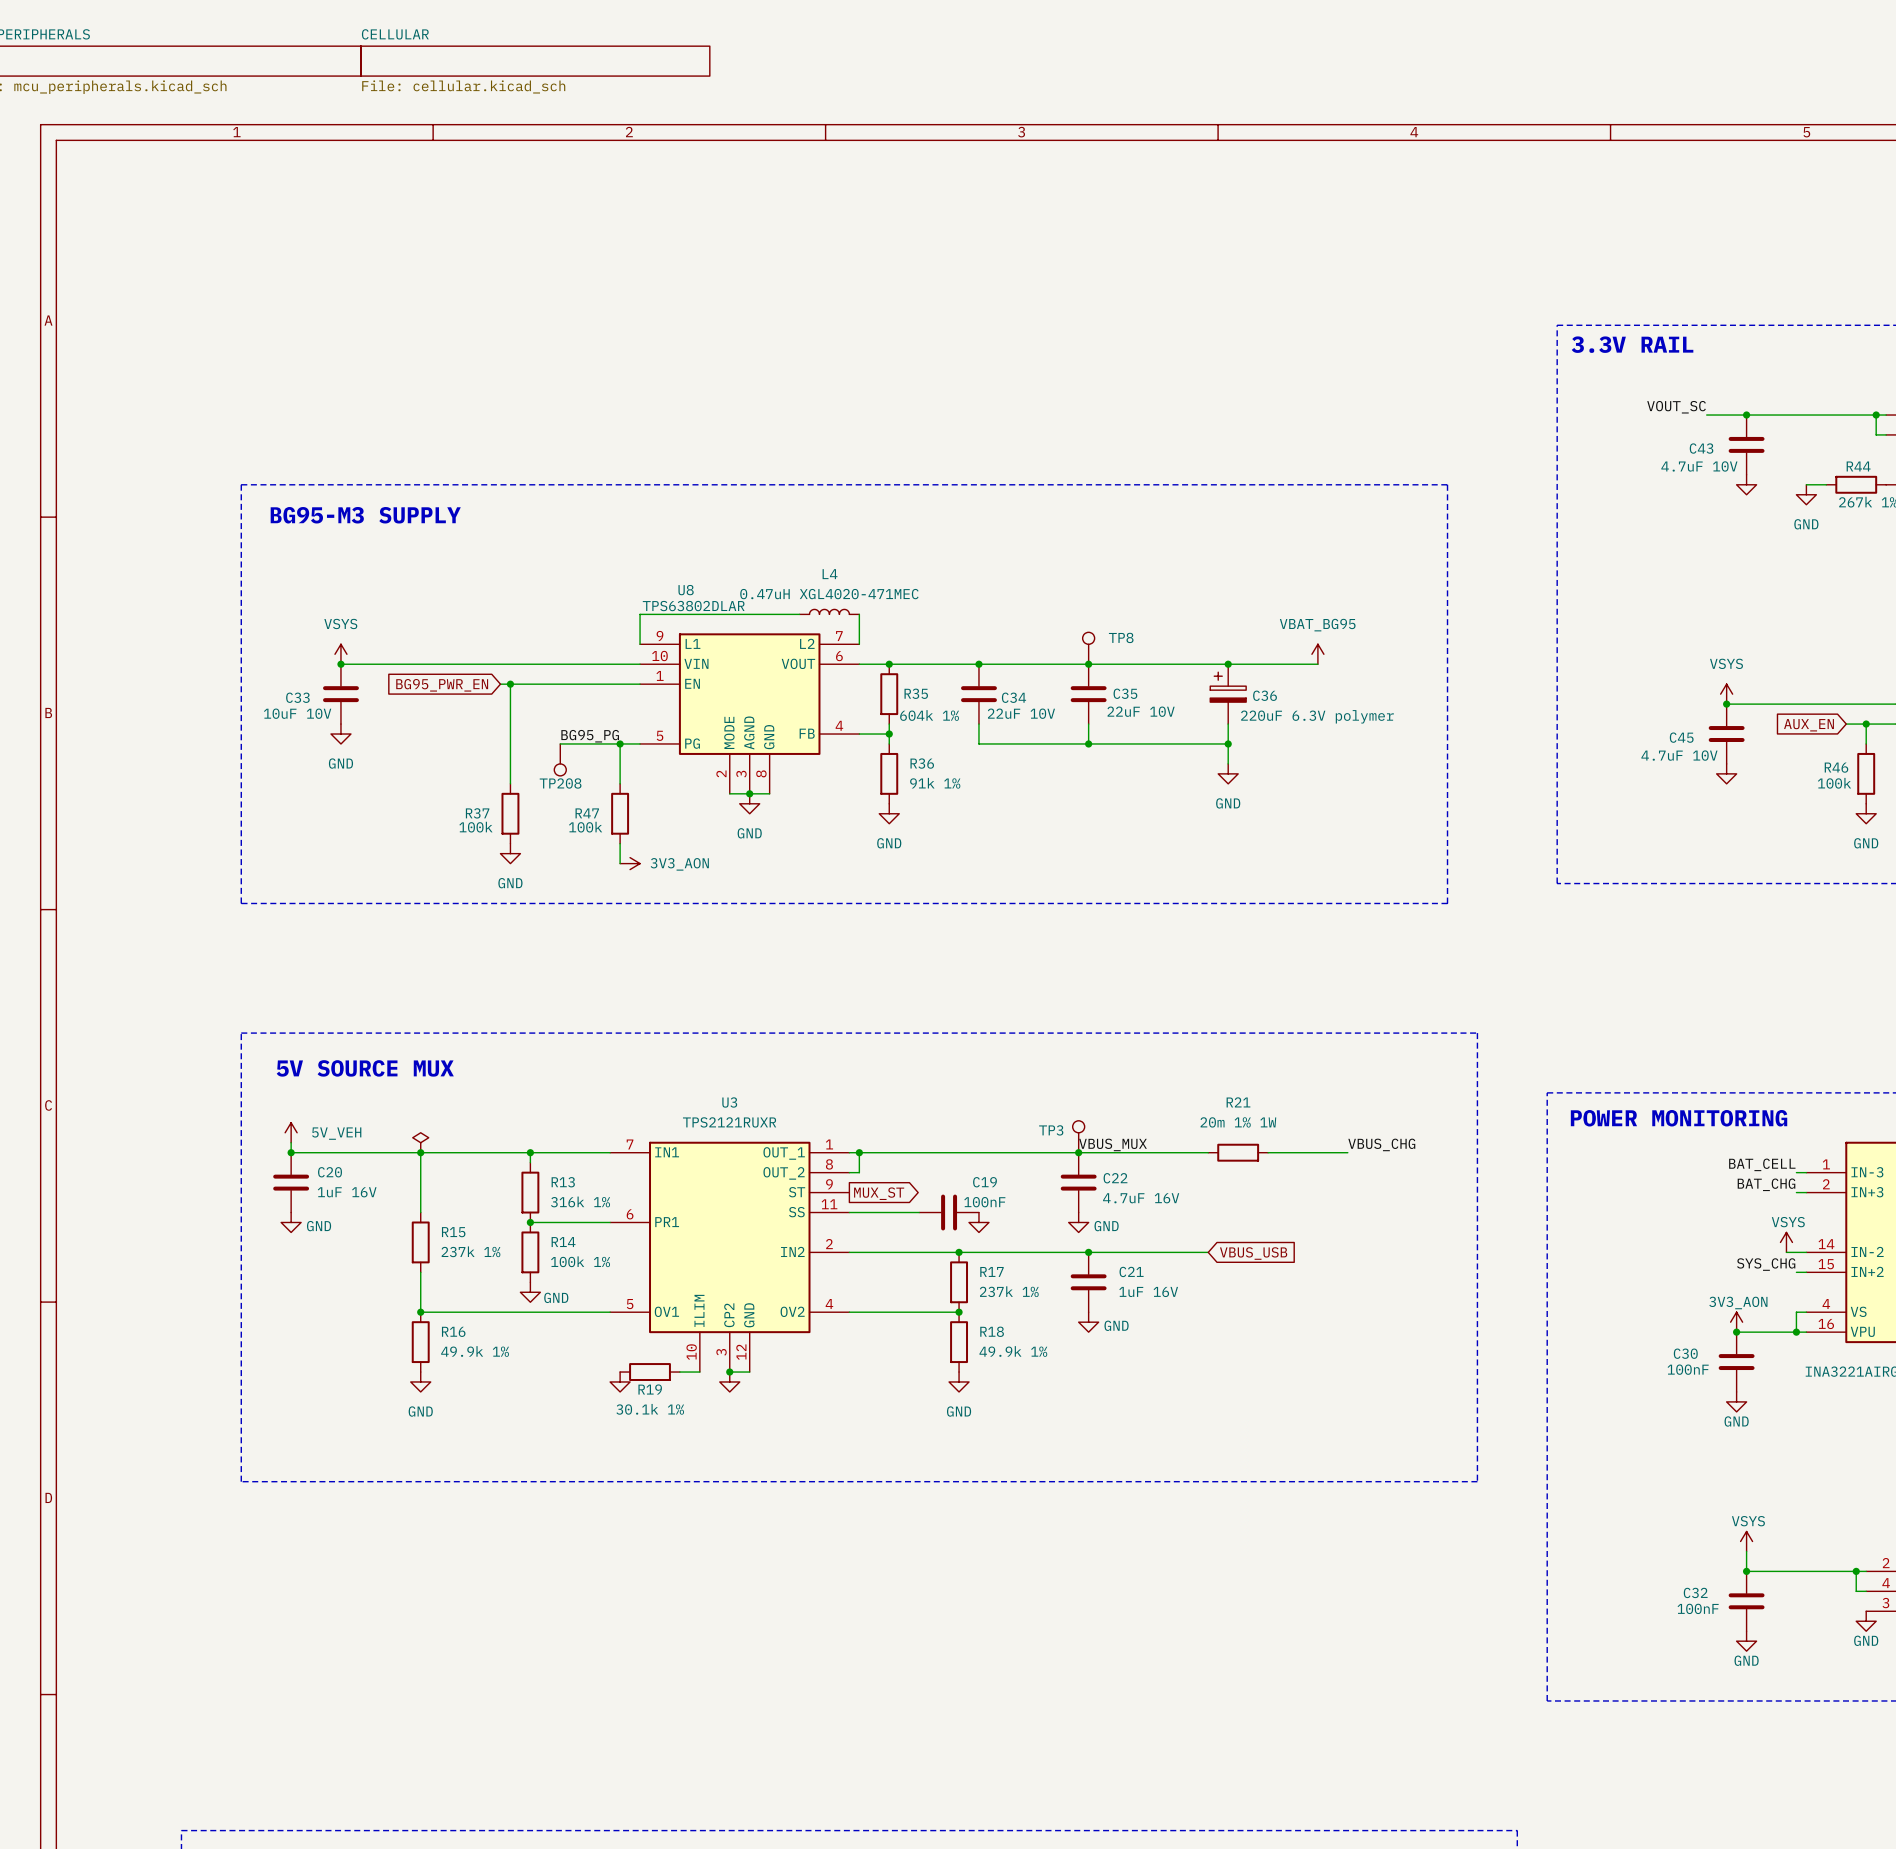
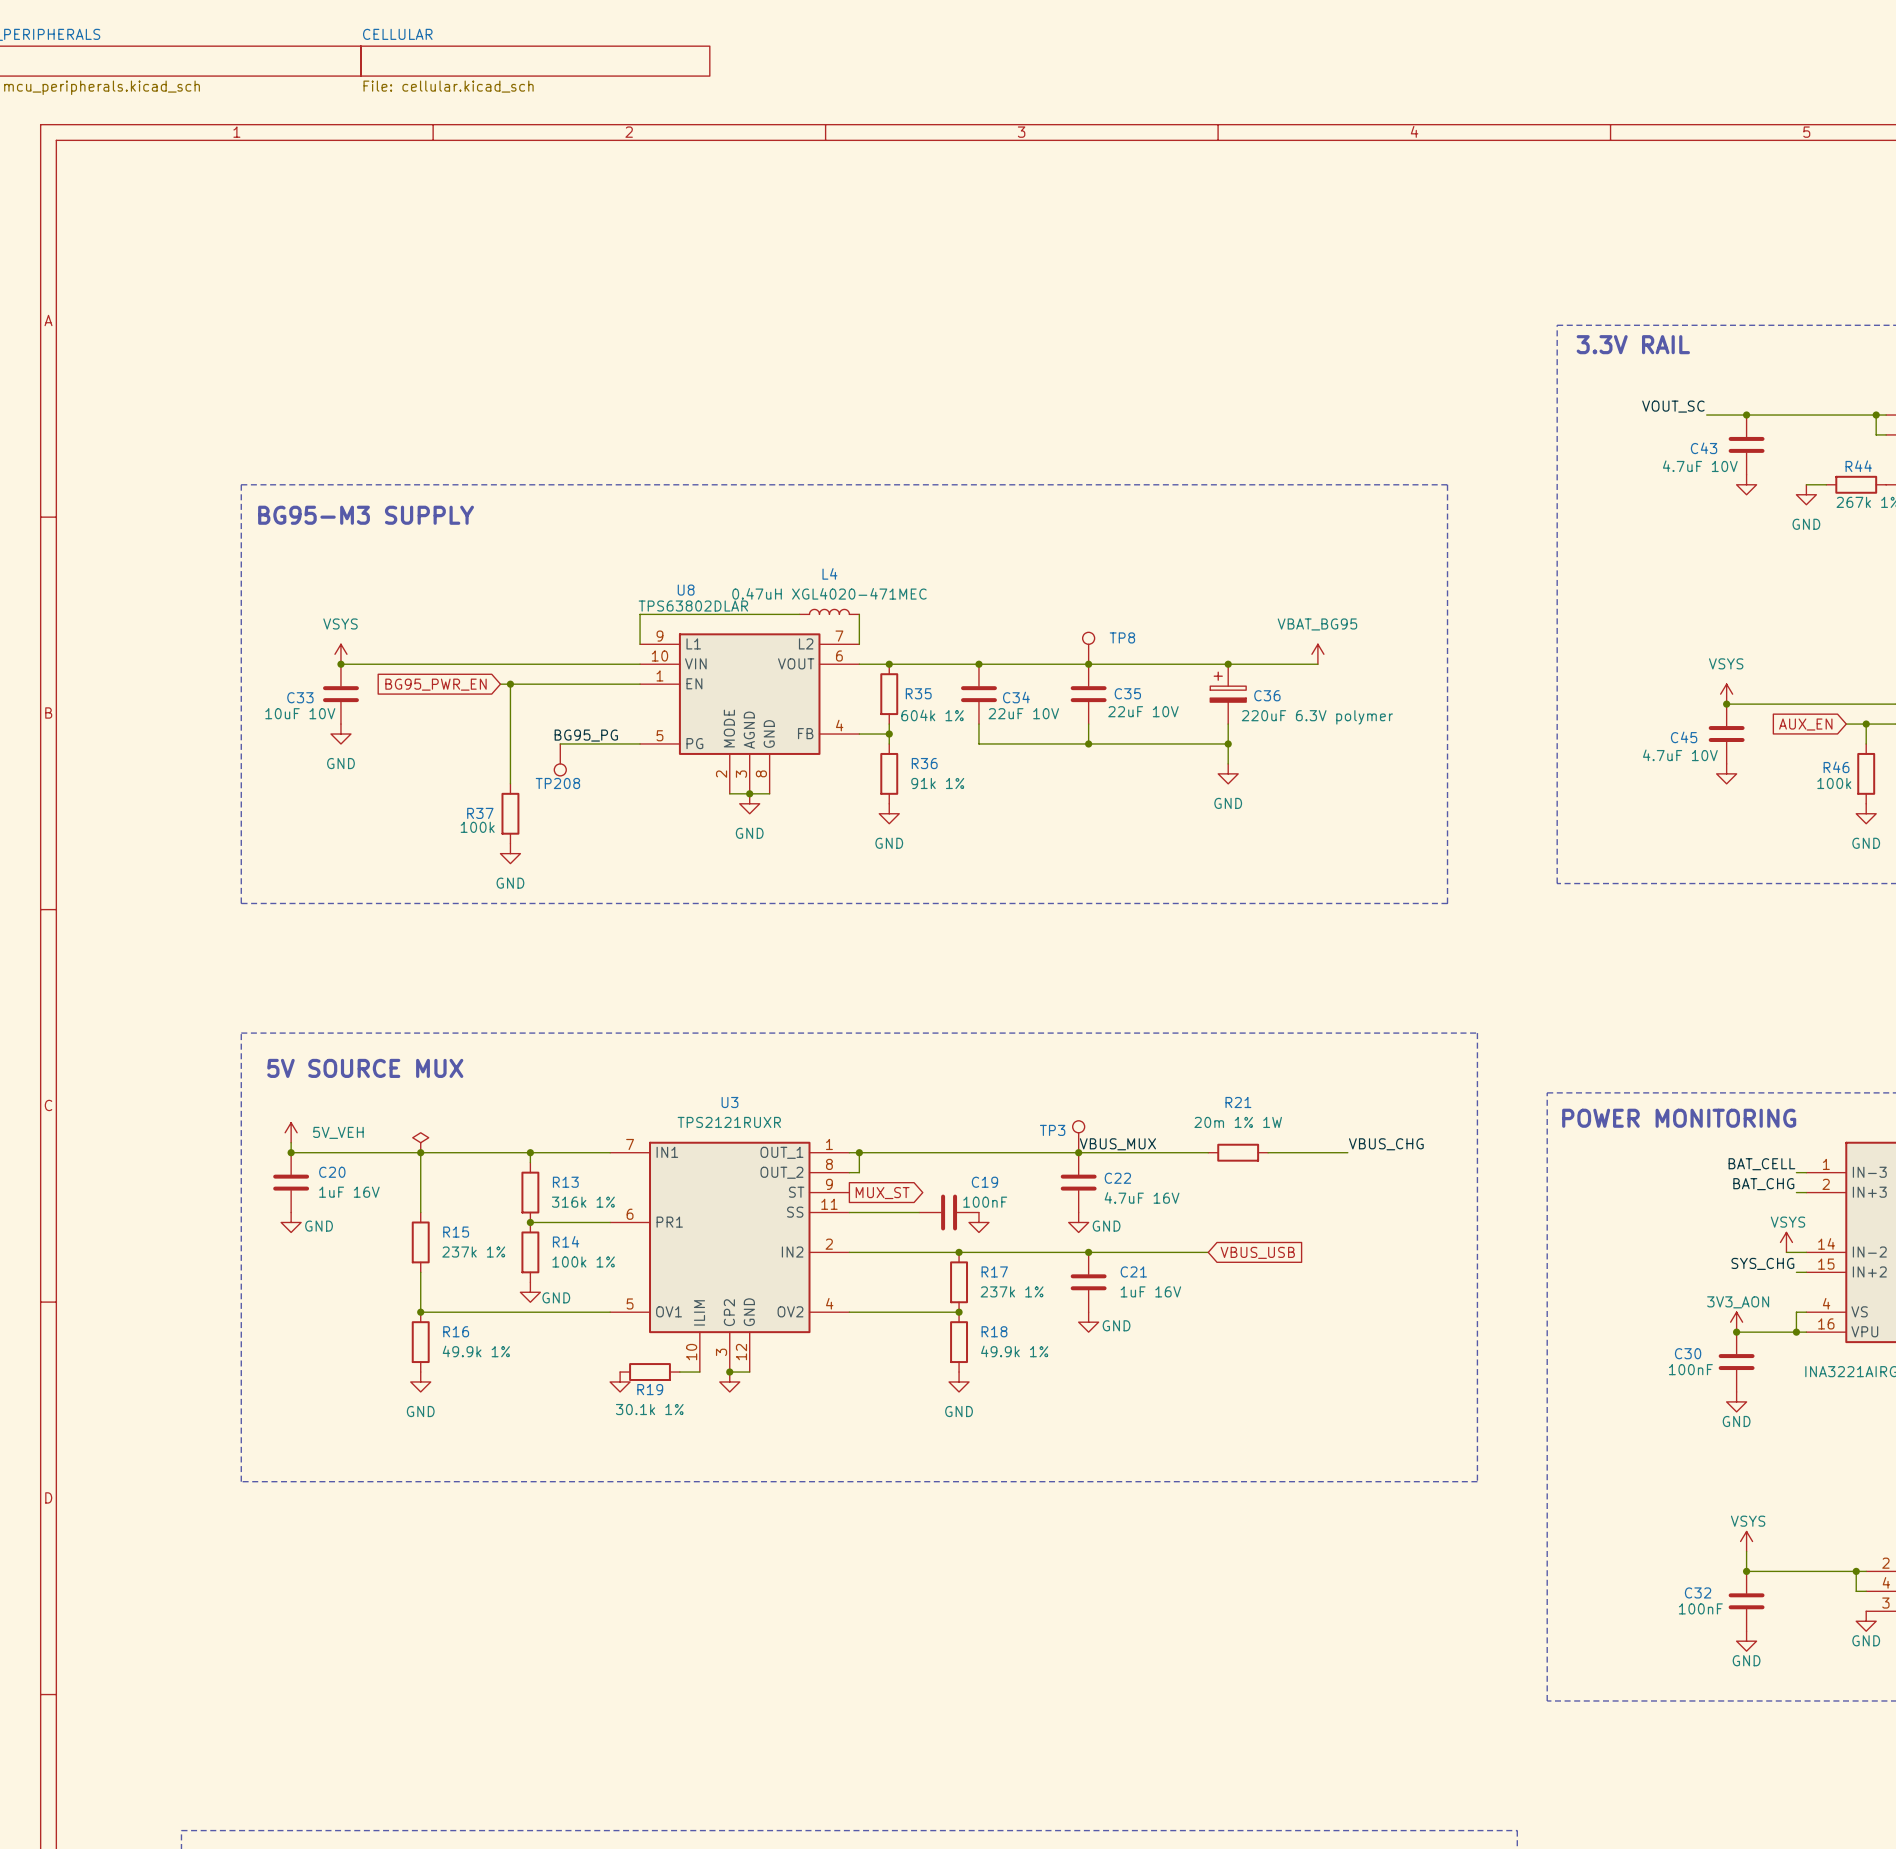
wire: (620, 743) (620, 783) -> none
junction: (620, 743) -> none
R47: 100k (620, 813) -> none
wire: (620, 843) (620, 863) -> none
power symbol: 3V3_AON (630, 863) -> none

